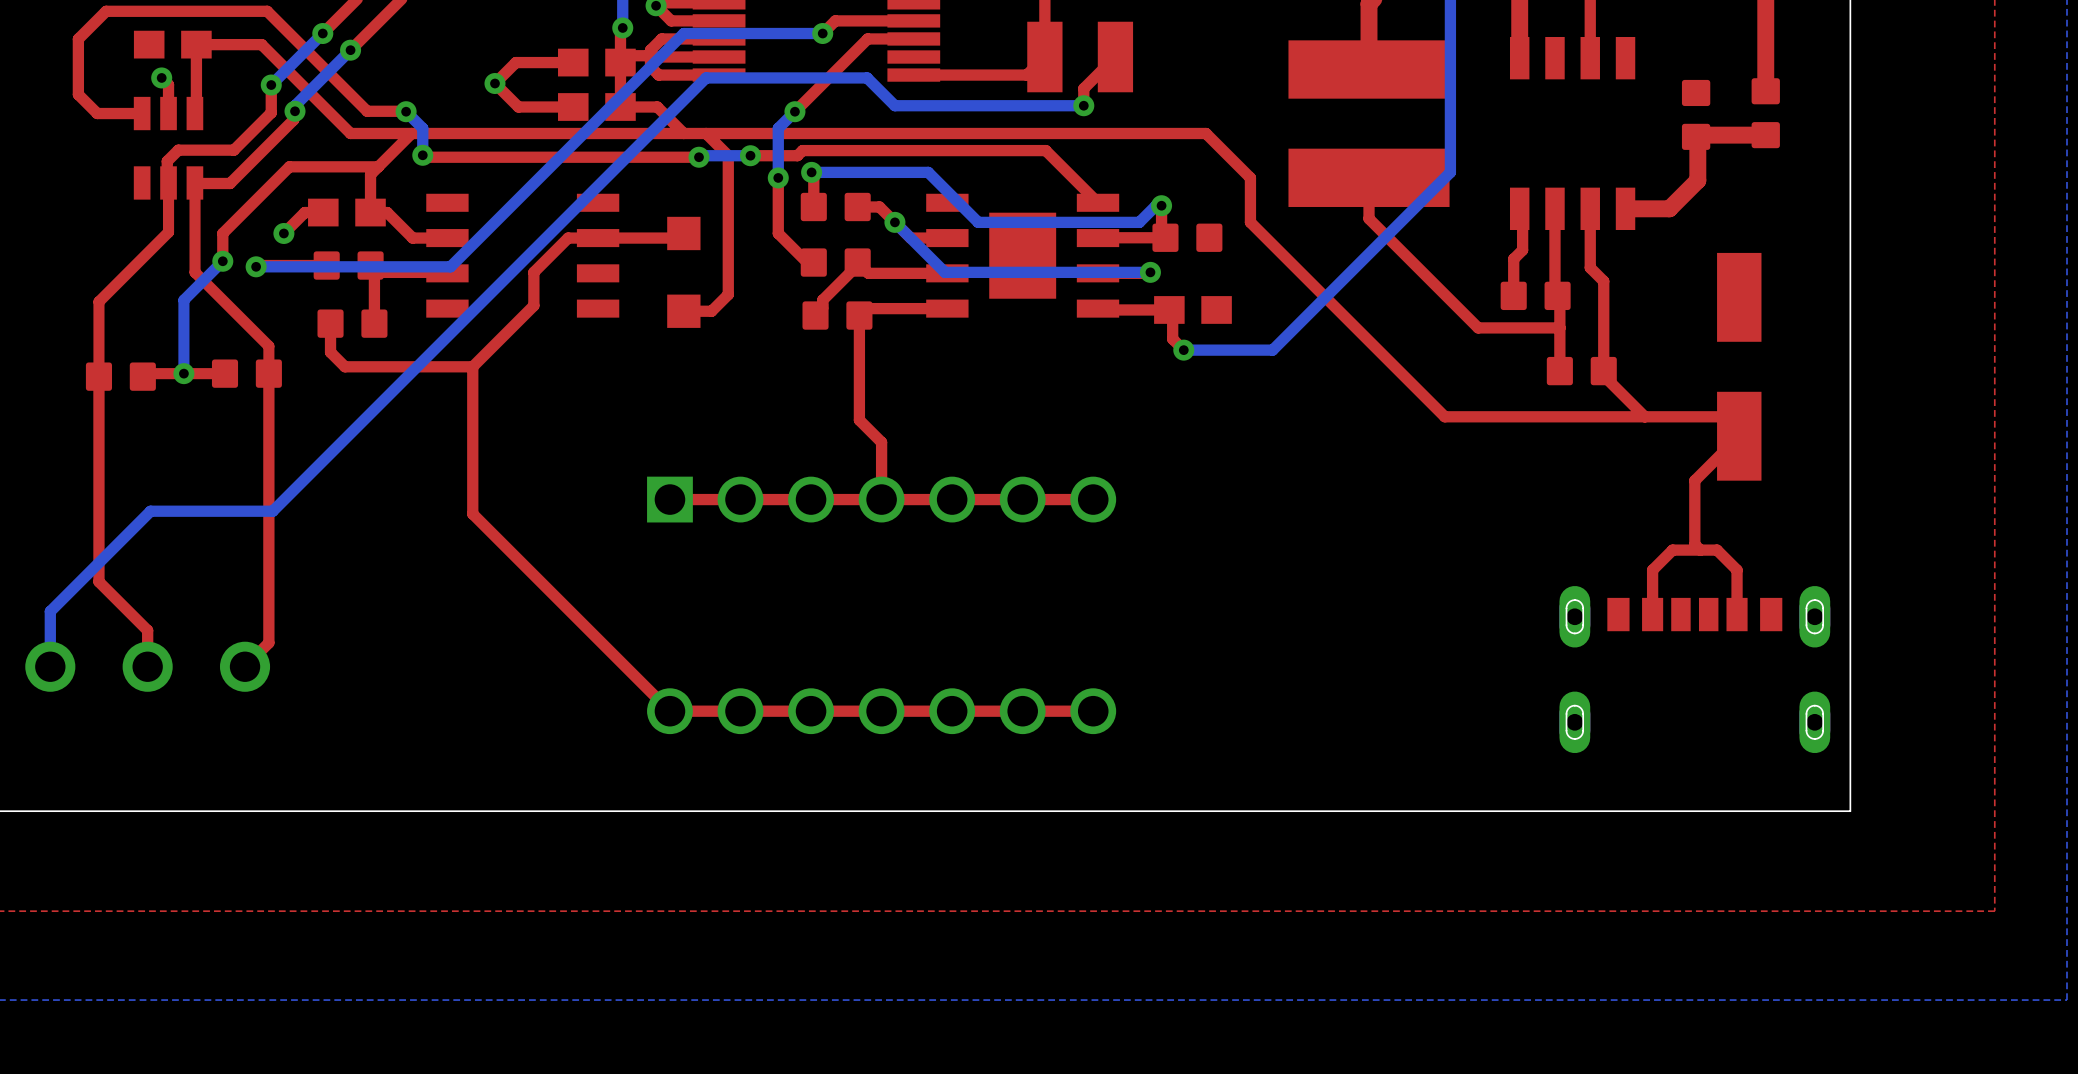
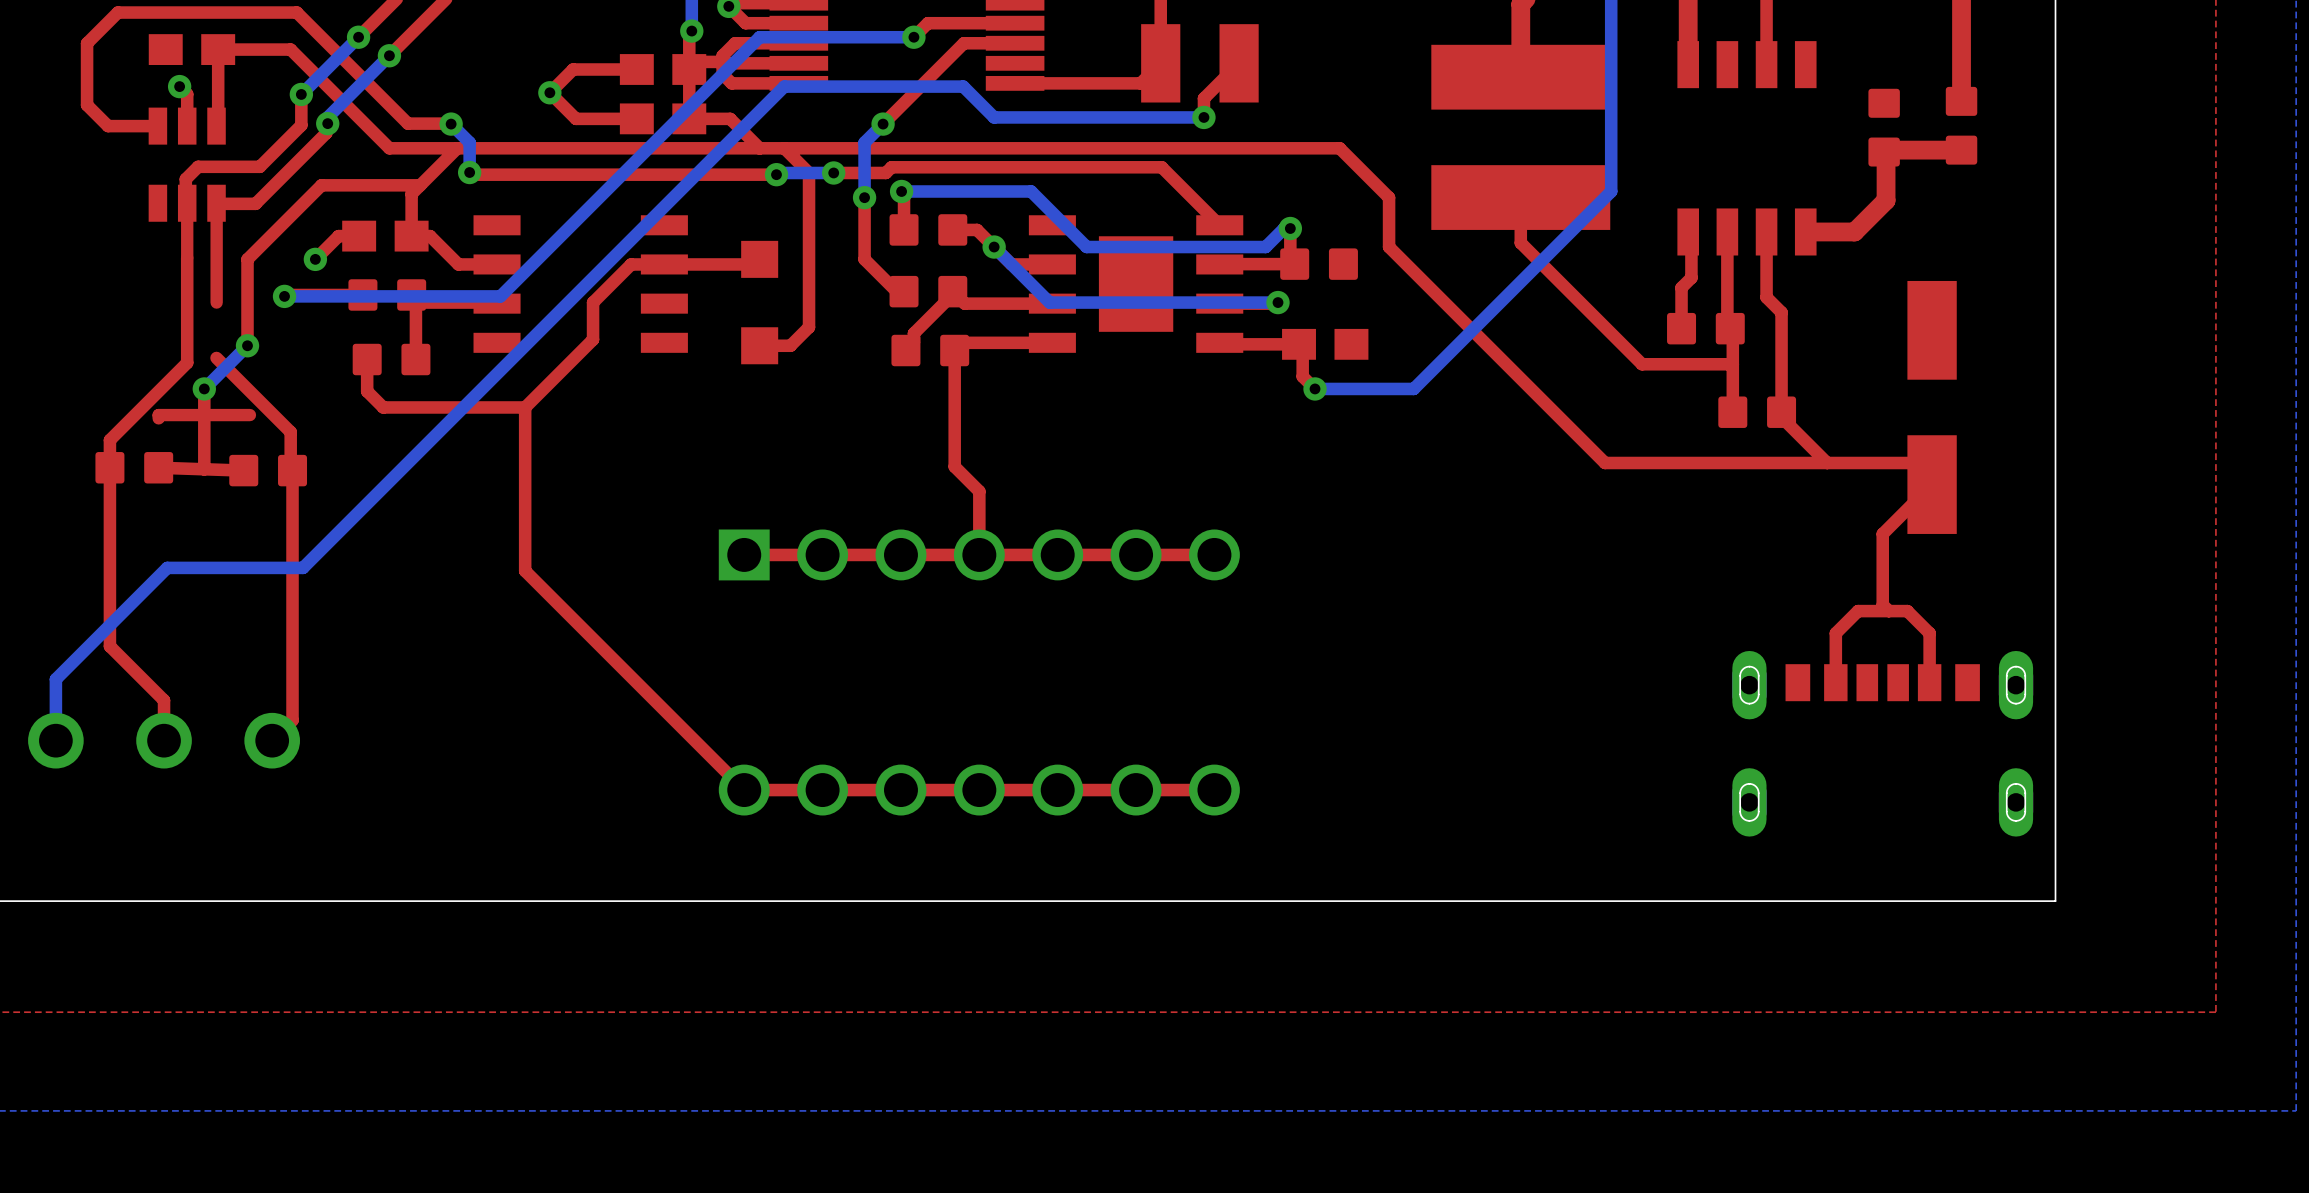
top track: (168, 232) (98, 301) (98, 396) -> (187, 257) (187, 362) (109, 440)
top track: none -> (247, 290) (247, 345)
bottom track: (222, 261) (183, 300) (183, 373) -> none
via: (222, 261) -> none
top track: (195, 272) (268, 346) (268, 642) (263, 648) -> (216, 357) (290, 432) (290, 468) (292, 470) (292, 720)
bottom track: none -> (247, 345) (204, 388)
via: none -> (247, 345)
top track: none -> (204, 388) (204, 469)
via position: (183, 373) -> (204, 388)
part position: (246, 373) -> (268, 470)
part position: (120, 376) -> (134, 467)
top track: none -> (158, 467) (243, 470)

